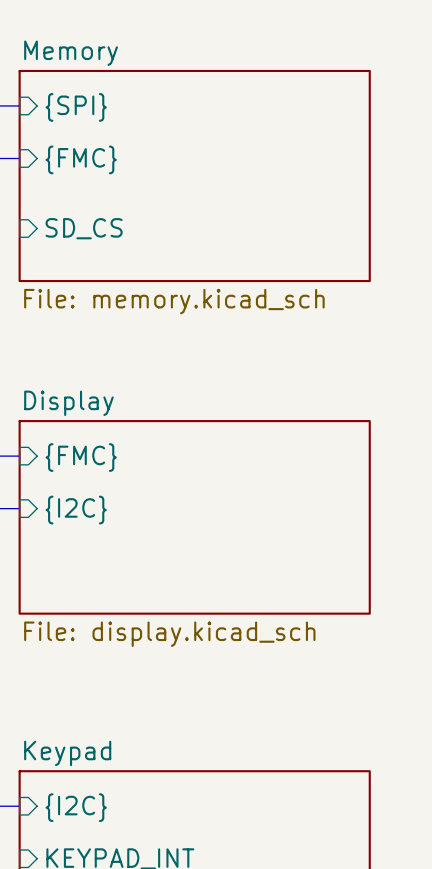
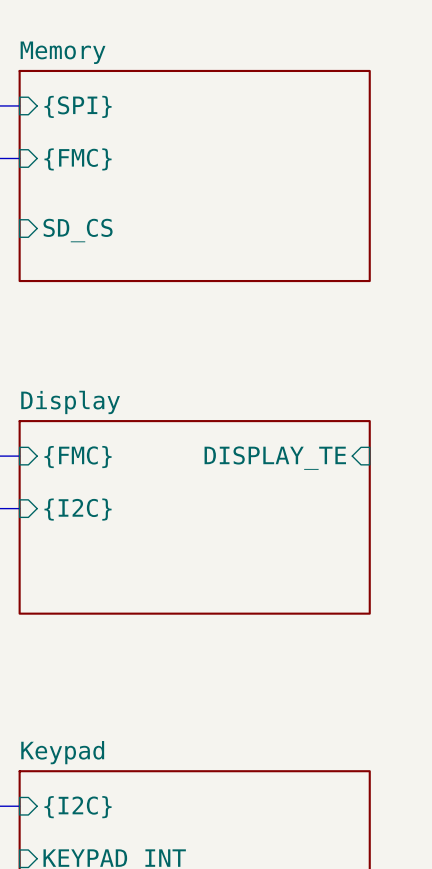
sheet Memory value: File: memory.kicad_sch (174, 301) -> none
sheet pin: none -> DISPLAY_TE (275, 458)
sheet Display value: File: display.kicad_sch (169, 634) -> none

